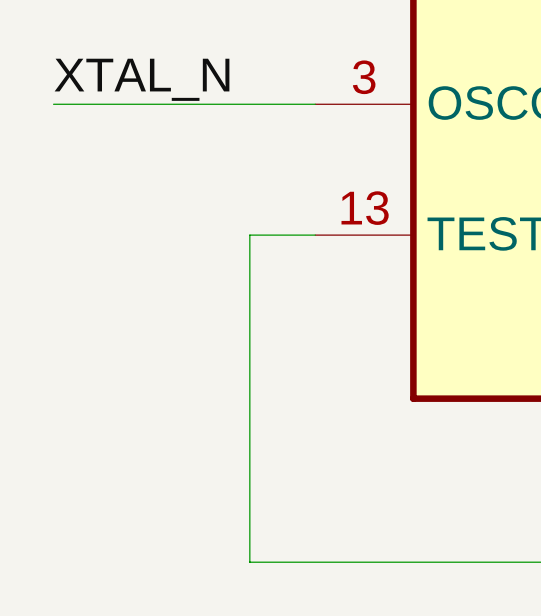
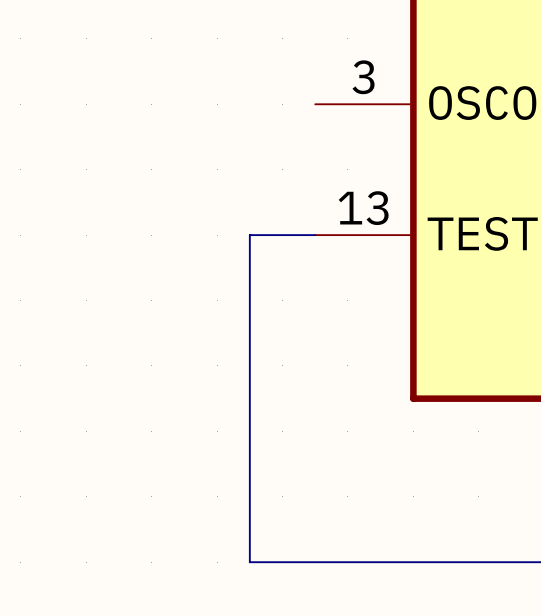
label: XTAL_N (142, 79) -> none
wire: (53, 104) (315, 104) -> none

